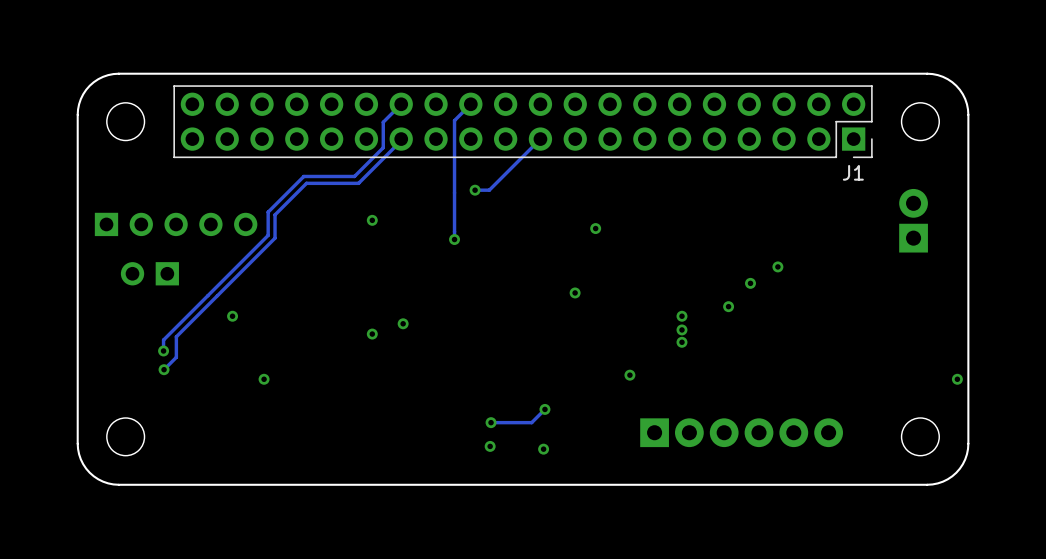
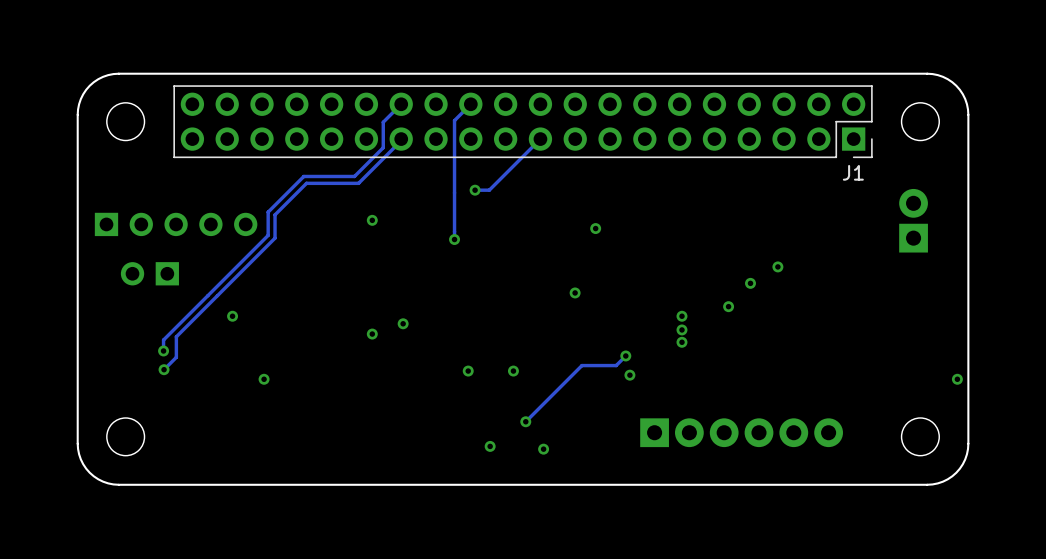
track: none -> (625, 355) (616, 365) (581, 365) (525, 421)
via: none -> (625, 355)
via: none -> (468, 371)
via: none -> (513, 371)
track: (544, 409) (531, 422) (491, 422) -> none
via: (544, 409) -> none
via: none -> (525, 421)
via: (491, 422) -> none

